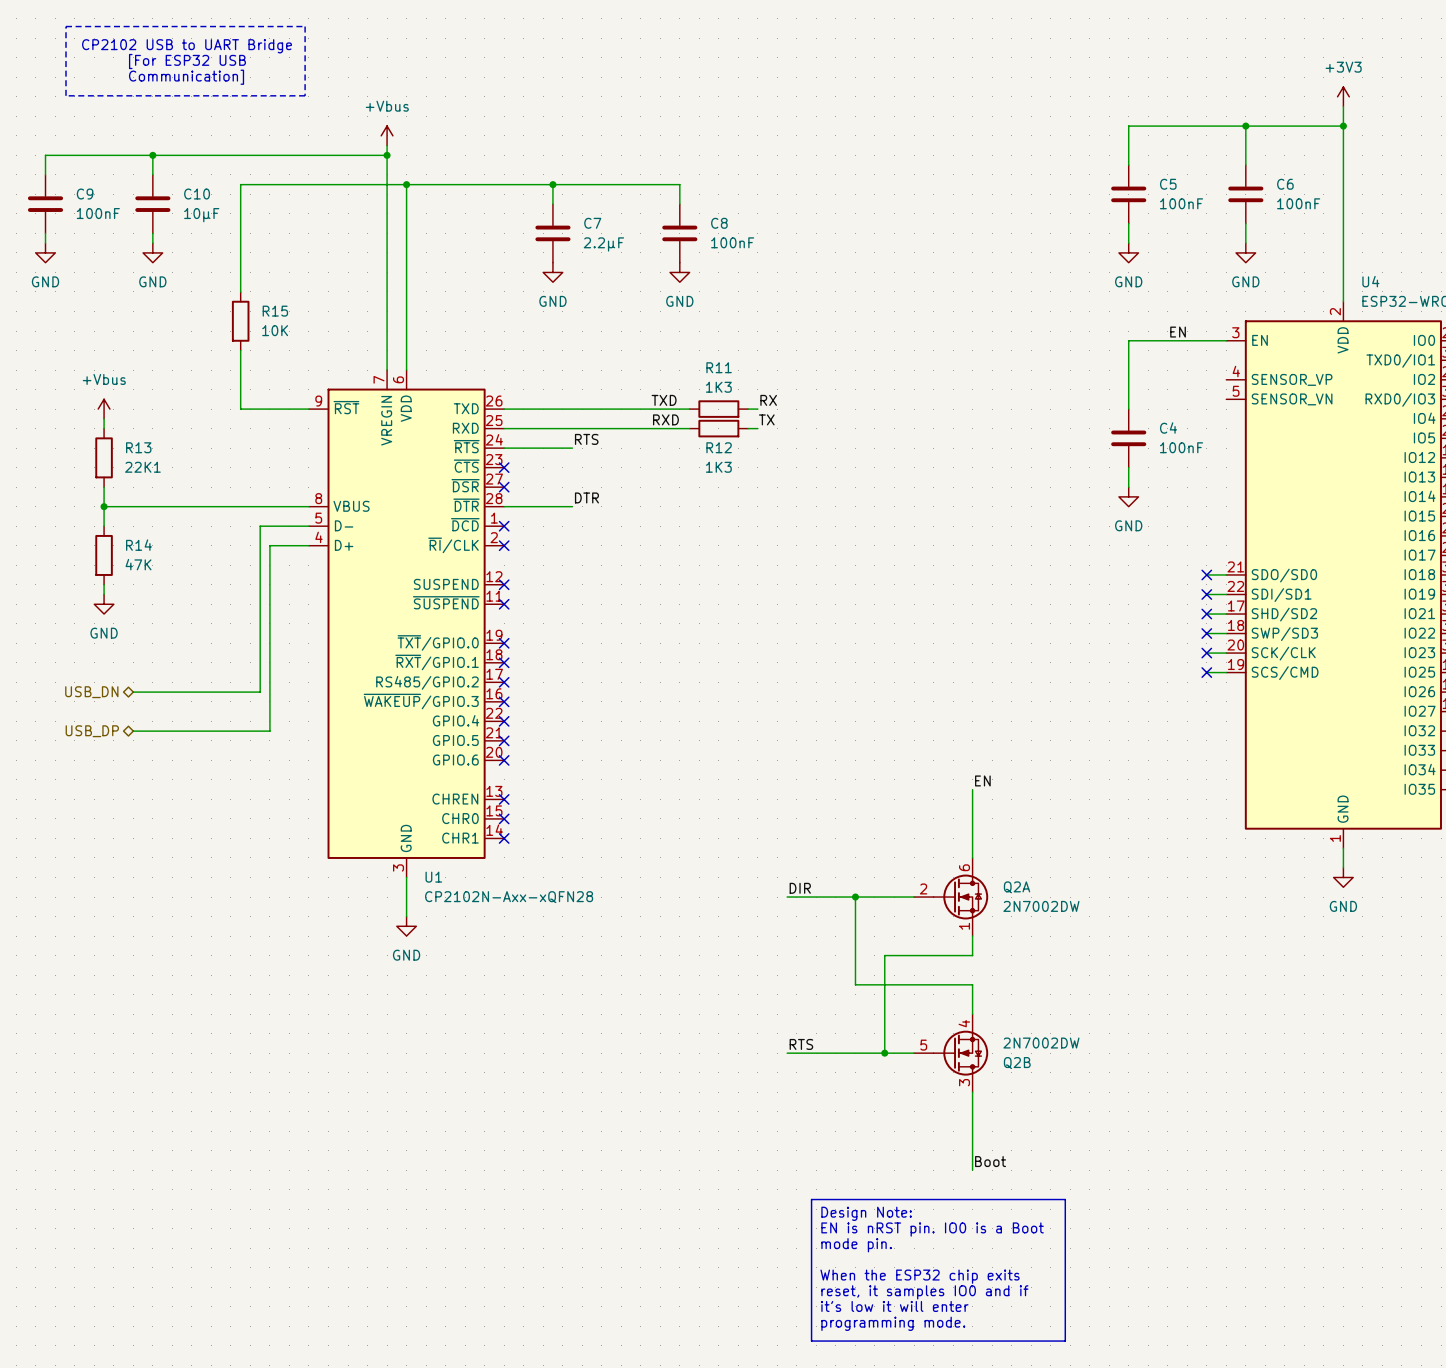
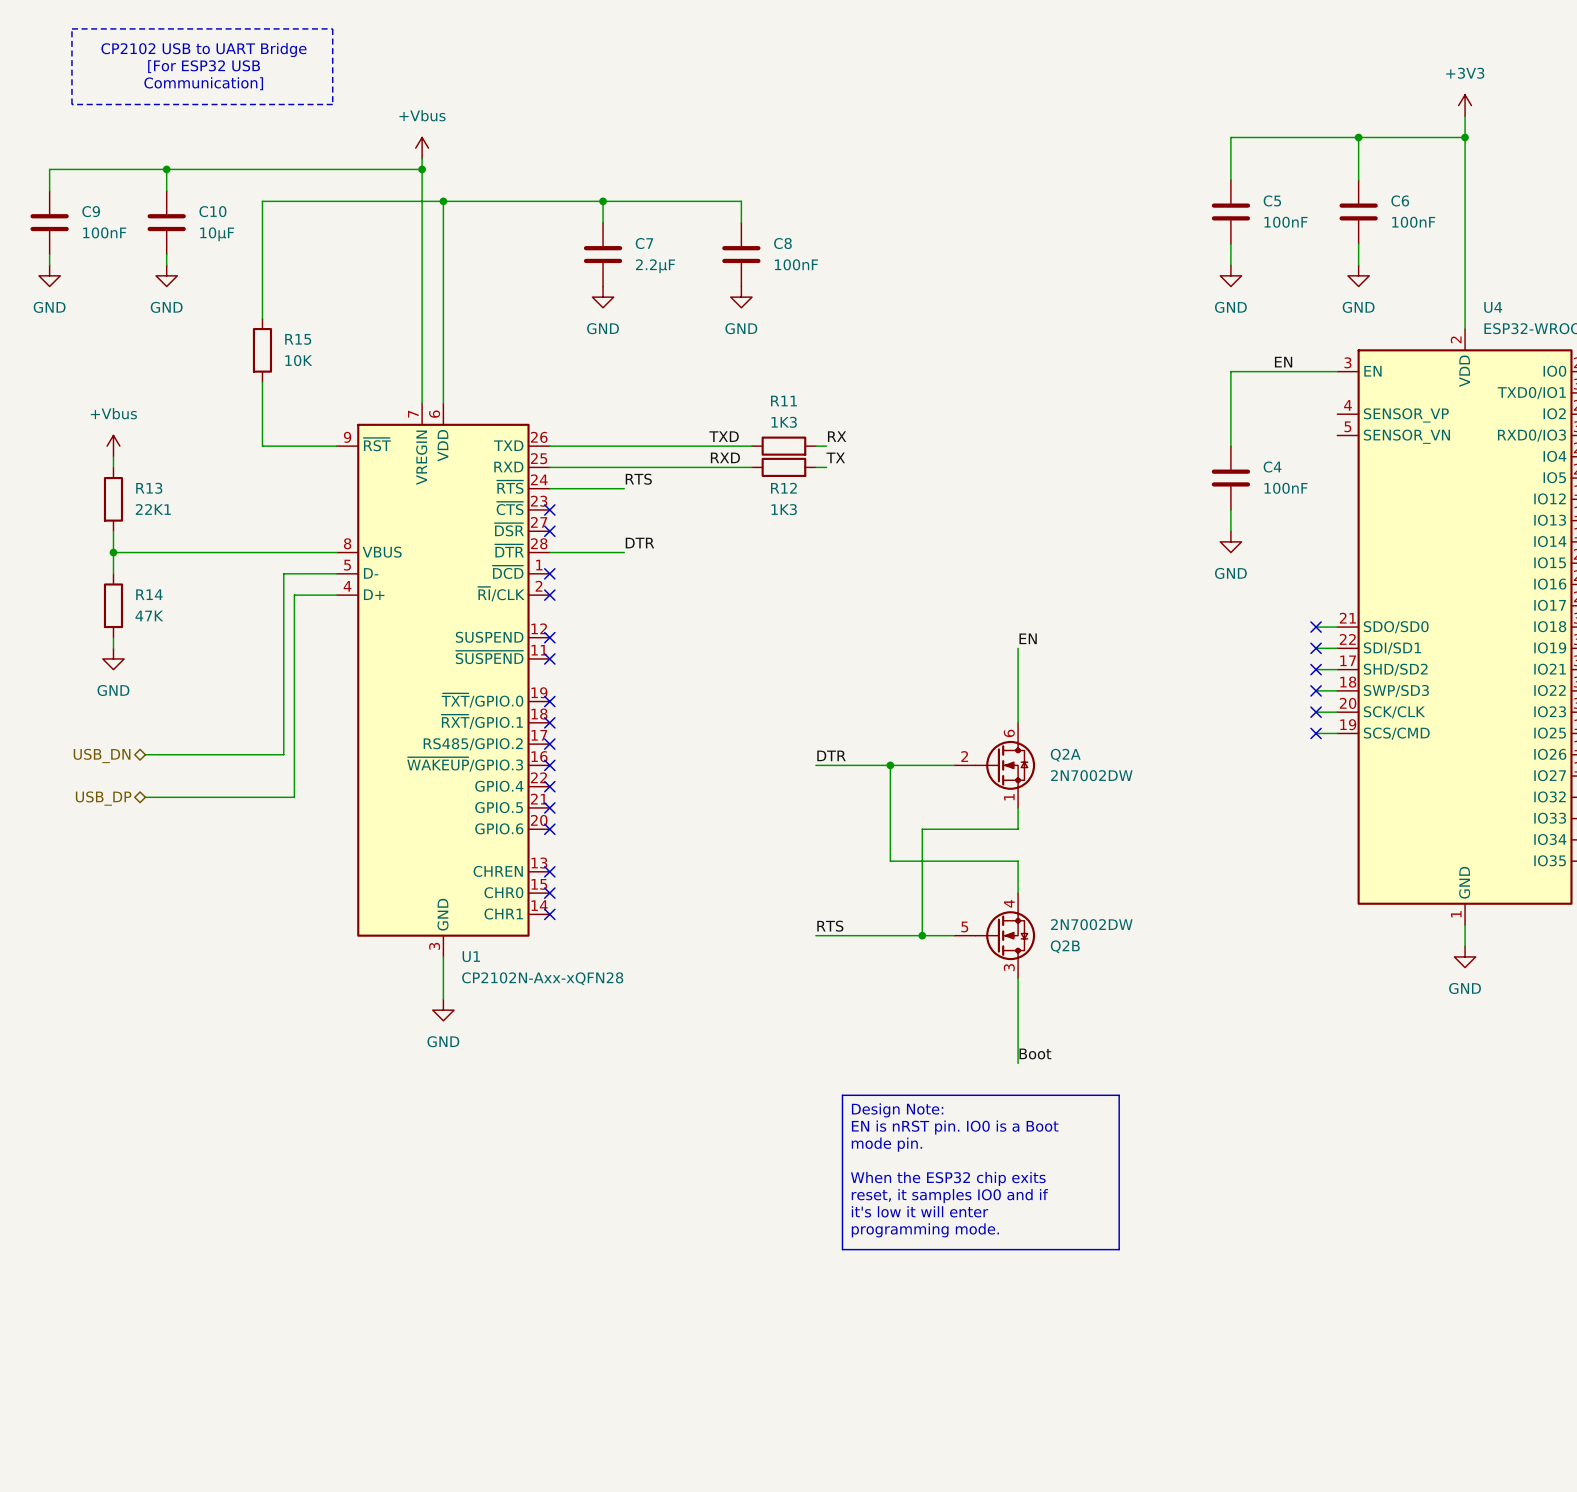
label: none -> EN (1028, 638)
wire: none -> (1018, 648) (1018, 722)
label: none -> DTR (831, 755)
wire: none -> (815, 765) (954, 765)
wire: none -> (890, 765) (890, 861) (1018, 861) (1018, 893)
junction: none -> (890, 765)
wire: none -> (1018, 807) (1018, 829) (922, 829) (922, 935)
label: EN (982, 780) -> none
wire: (972, 789) (972, 857) -> none
label: none -> RTS (830, 926)
label: DIR (800, 888) -> none
wire: (787, 897) (914, 897) -> (815, 935) (954, 935)
wire: (855, 897) (855, 984) (972, 984) (972, 1014) -> none
junction position: (855, 897) -> (922, 935)
wire: none -> (1018, 978) (1018, 1063)
Q2A position: (951, 897) -> (994, 765)
wire: (972, 936) (972, 955) (884, 955) (884, 1053) -> none
label: none -> Boot (1035, 1053)
line: none -> (842, 1095) (1119, 1095) (1119, 1249) (842, 1249) (842, 1095)
text: none -> Design Note: (897, 1110)
text: none -> EN is nRST pin. IO0 is a Boot (955, 1127)
label: RTS (801, 1044) -> none
text: none -> mode pin. (886, 1144)
wire: (787, 1053) (914, 1053) -> none
junction: (884, 1053) -> none
Q2B position: (951, 1053) -> (994, 935)
text: none -> When the ESP32 chip exits (948, 1178)
wire: (972, 1092) (972, 1170) -> none
text: none -> reset, it samples IO0 and if (949, 1196)
text: none -> it's low it will enter (920, 1211)
text: none -> programming mode. (925, 1230)
label: Boot (990, 1161) -> none
line: (811, 1199) (1065, 1199) (1065, 1341) (811, 1341) (811, 1199) -> none
text: Design Note: (866, 1213) -> none
text: EN is nRST pin. IO0 is a Boot (932, 1229) -> none
text: mode pin. (856, 1245) -> none
text: When the ESP32 chip exits (920, 1276) -> none
text: reset, it samples IO0 and if (924, 1292) -> none
text: it's low it will enter (894, 1306) -> none
text: programming mode. (893, 1323) -> none

